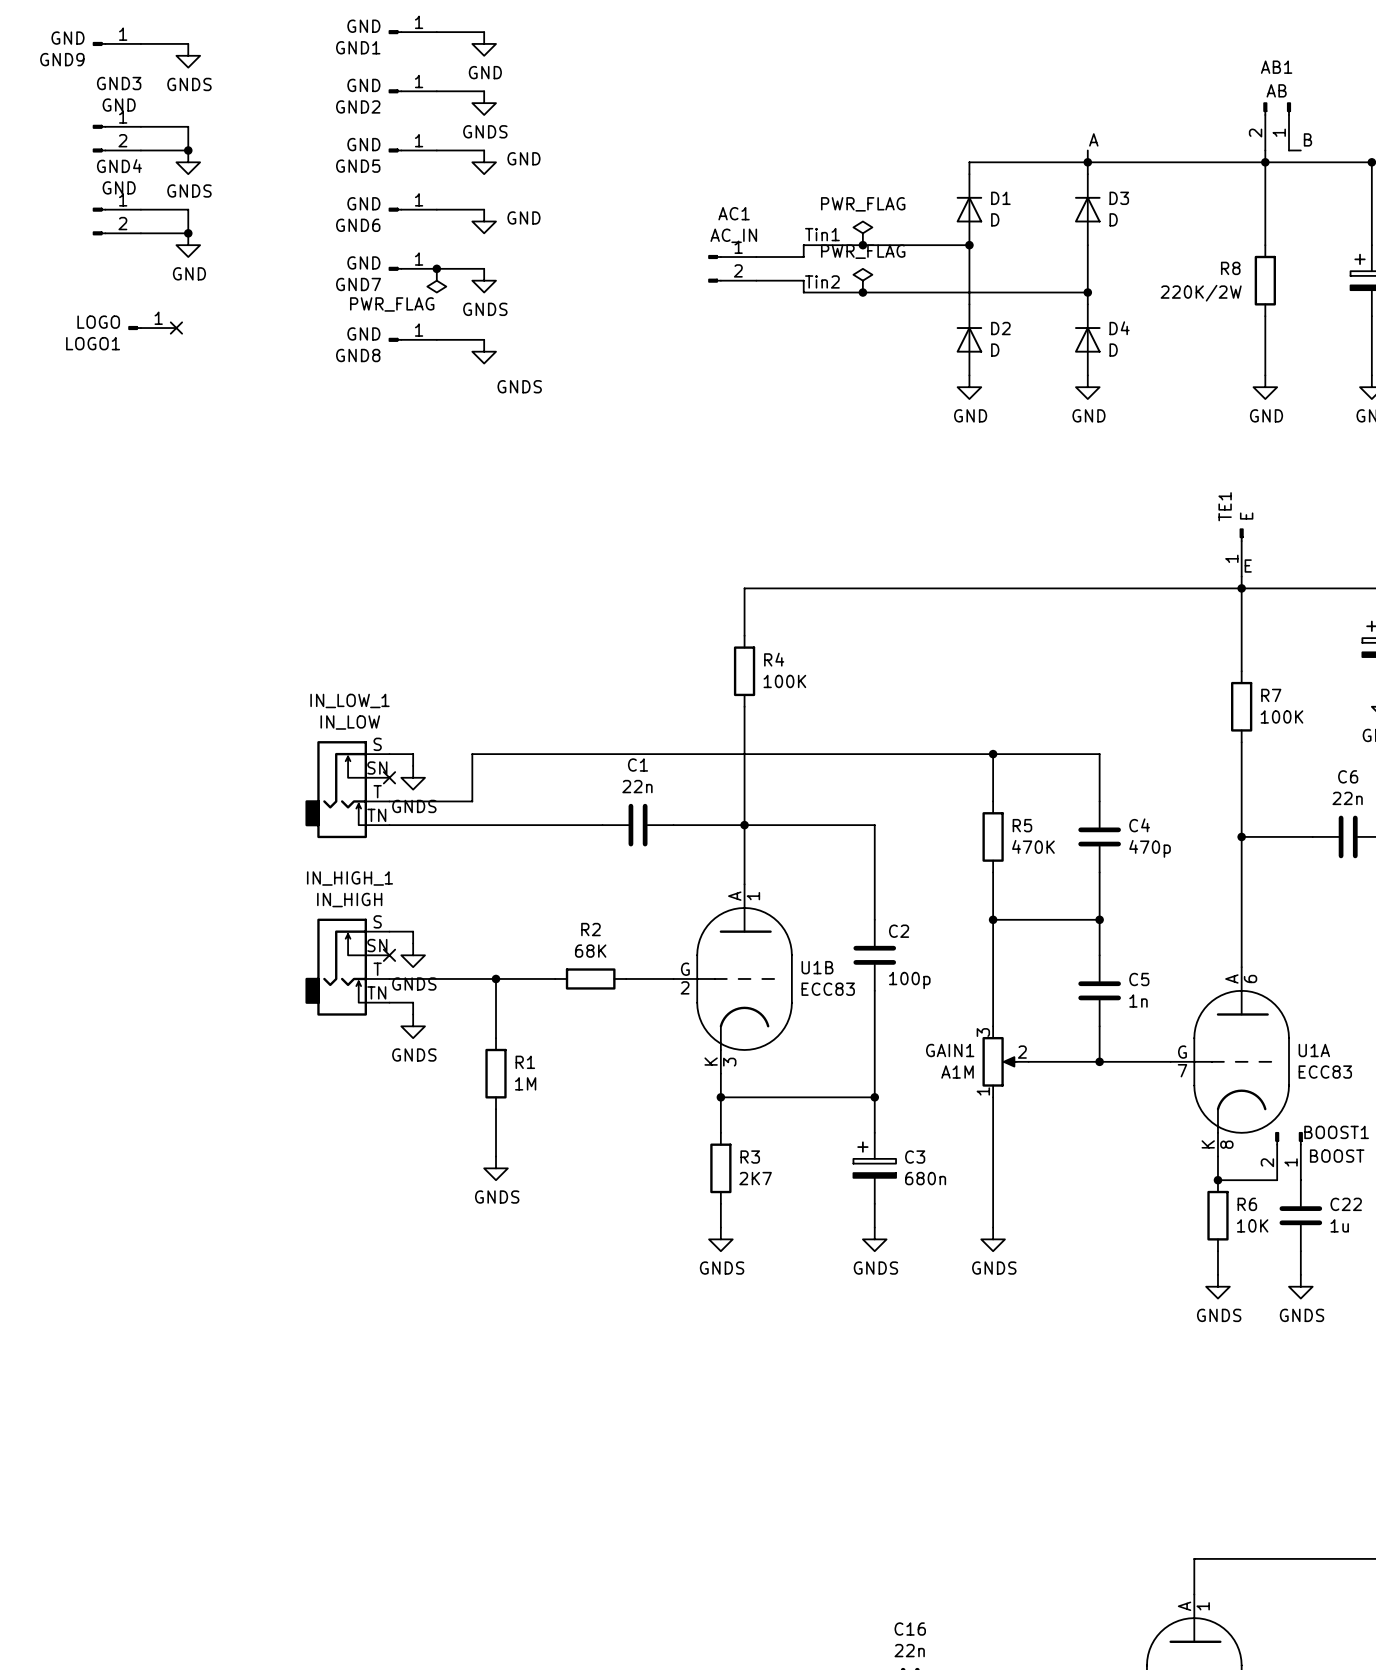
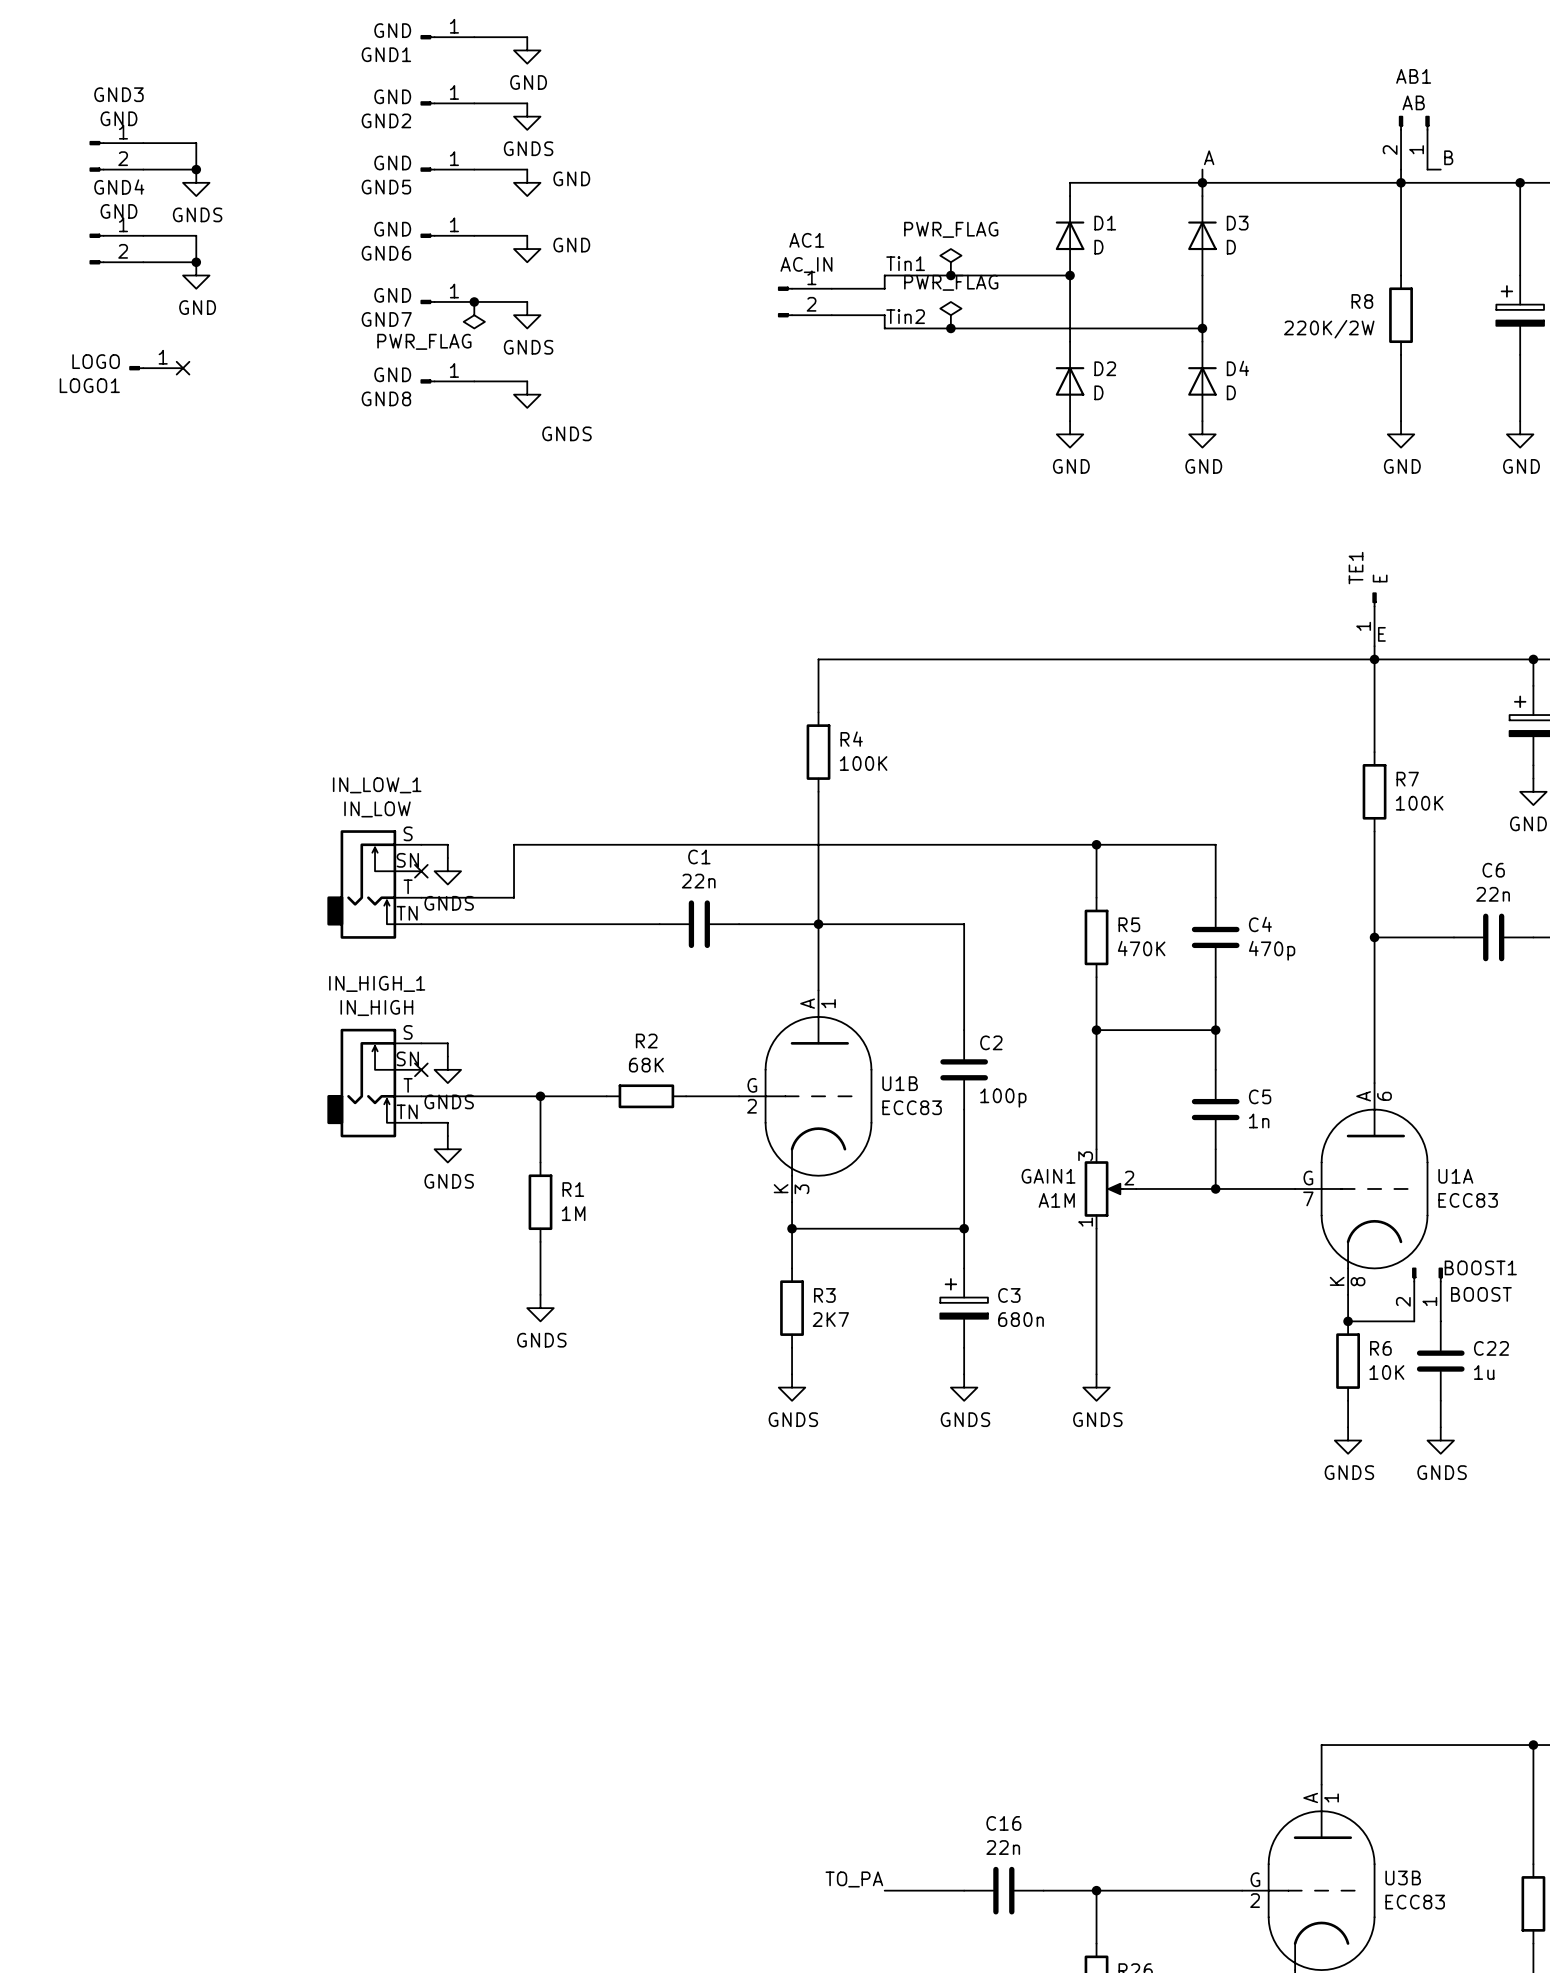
GND9: GND (116, 43) -> none
wire: (140, 43) (188, 43) -> none
power symbol: GNDS (188, 55) -> none

